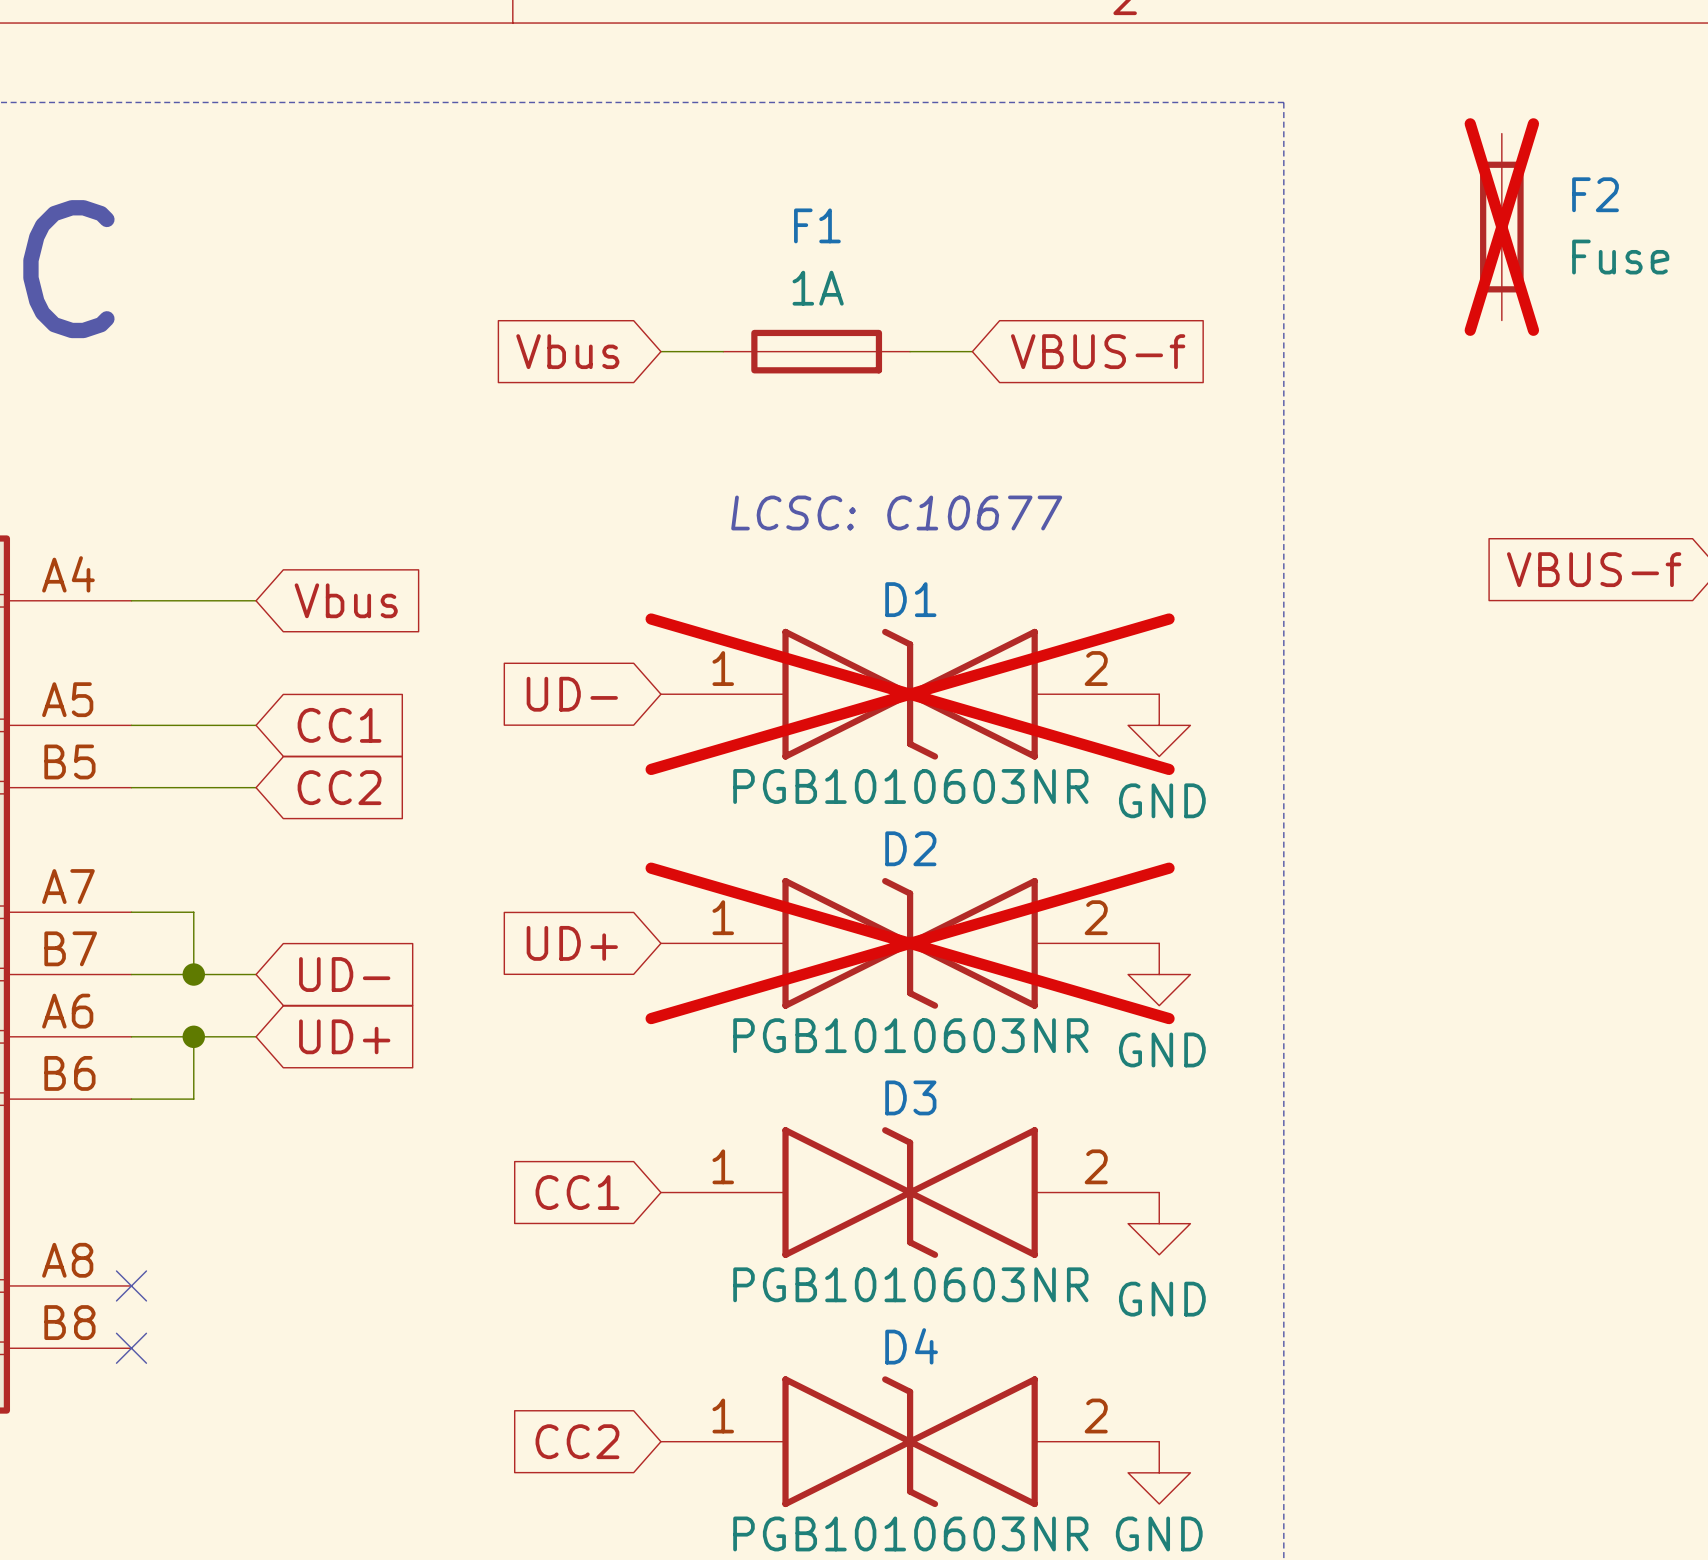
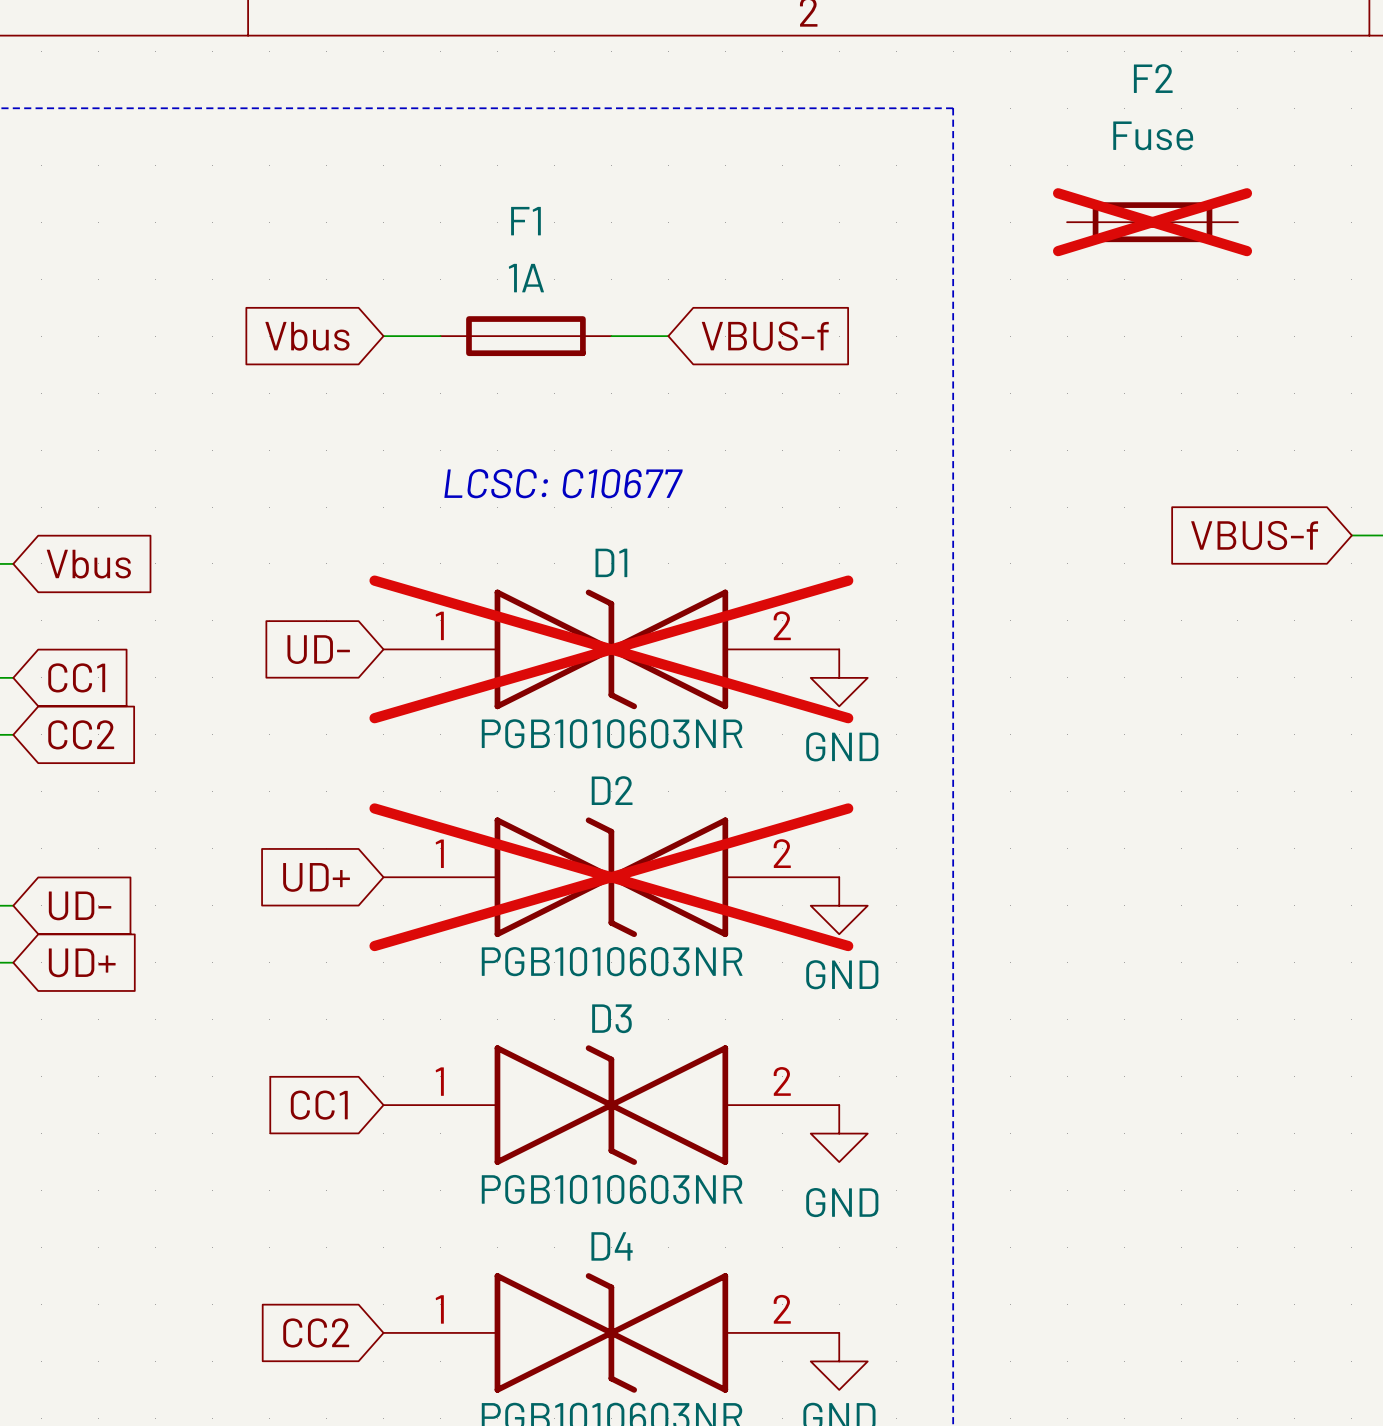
F2 name position: F2 (1595, 194) -> F2 (1153, 78)
F2 rotation: 0° (1501, 227) -> 90° clockwise (1152, 222)
F2 value position: Fuse (1620, 257) -> Fuse (1153, 135)

